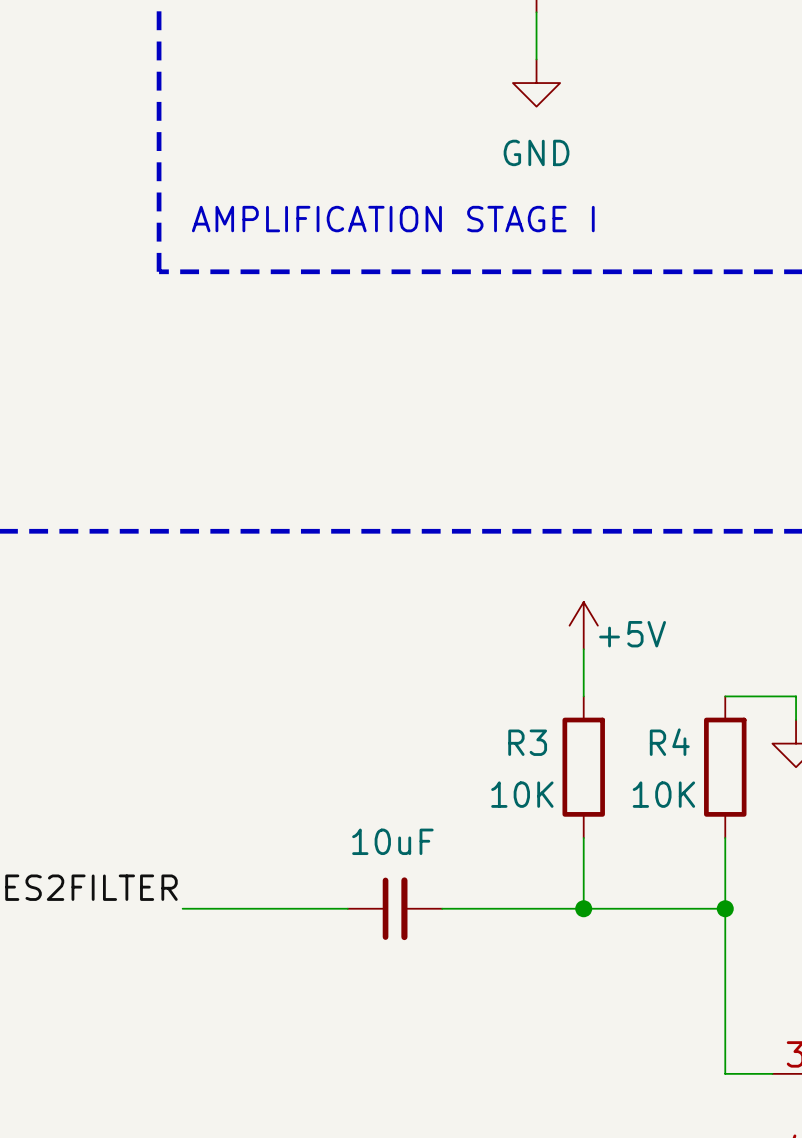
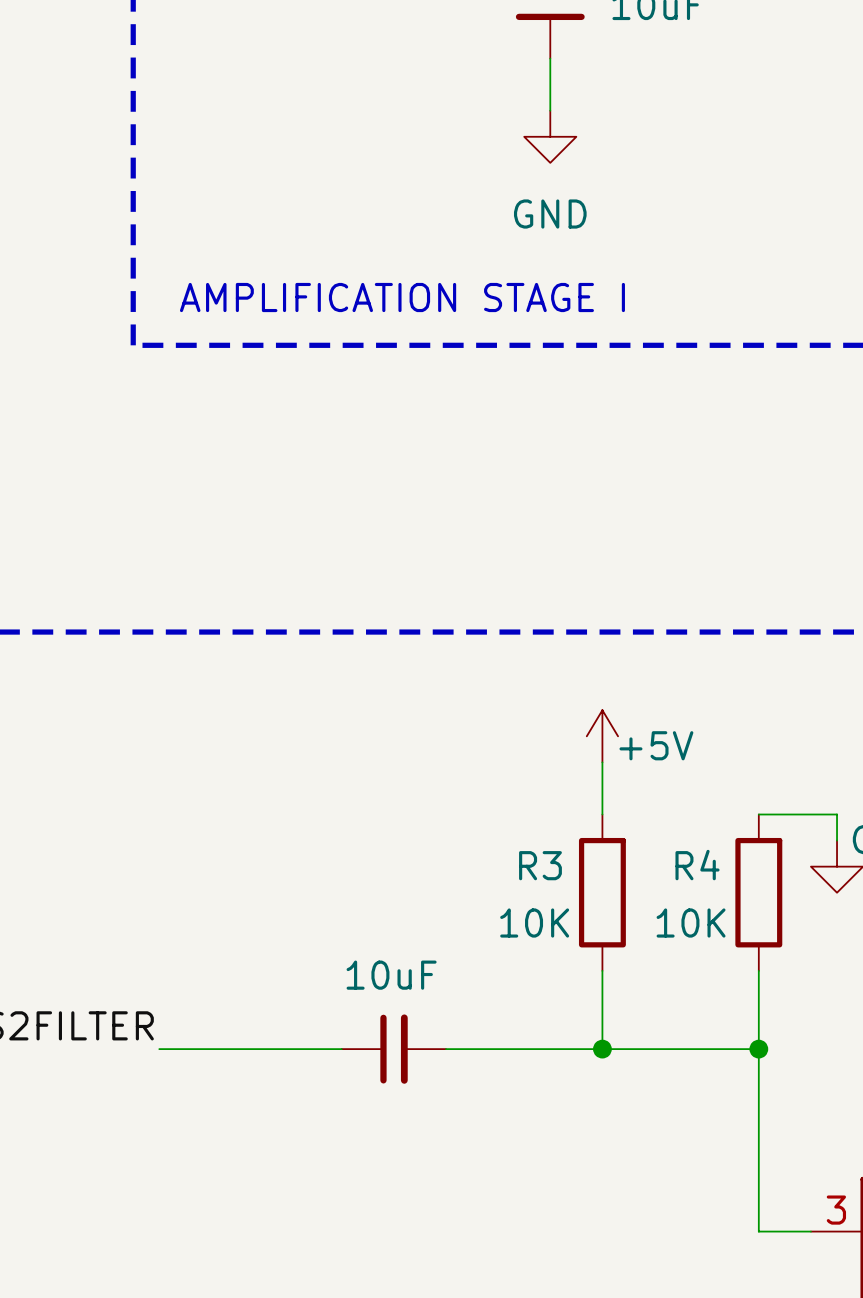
text position: AMPLIFICATION STAGE I (393, 219) -> AMPLIFICATION STAGE I (402, 297)

